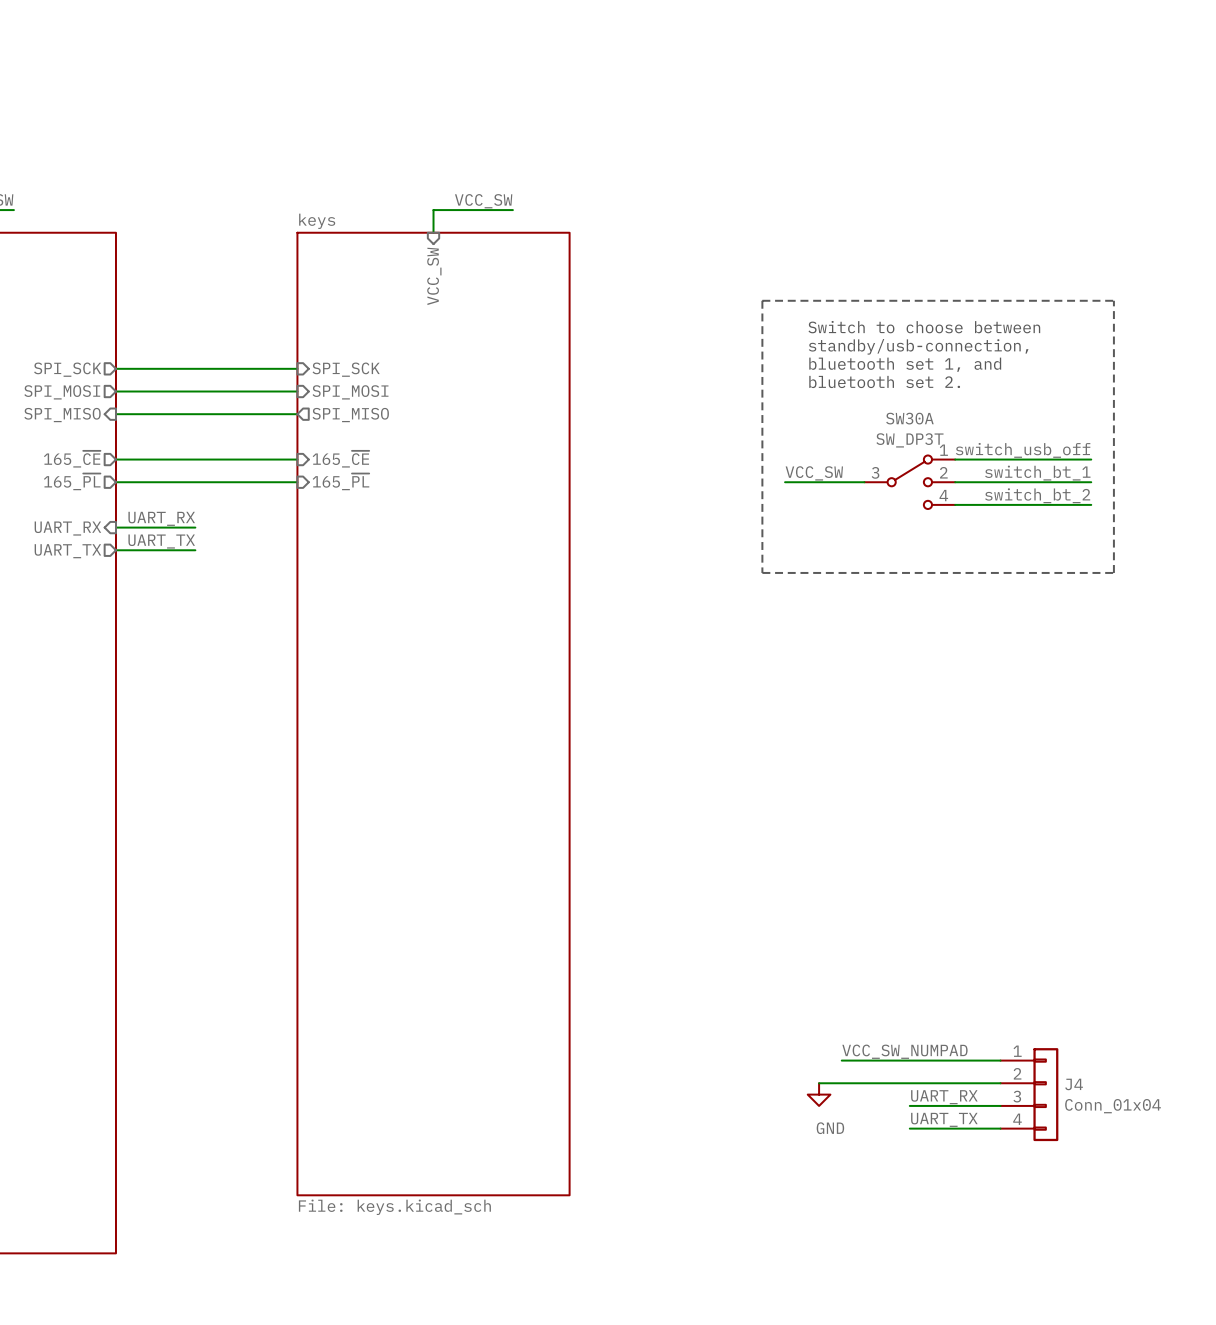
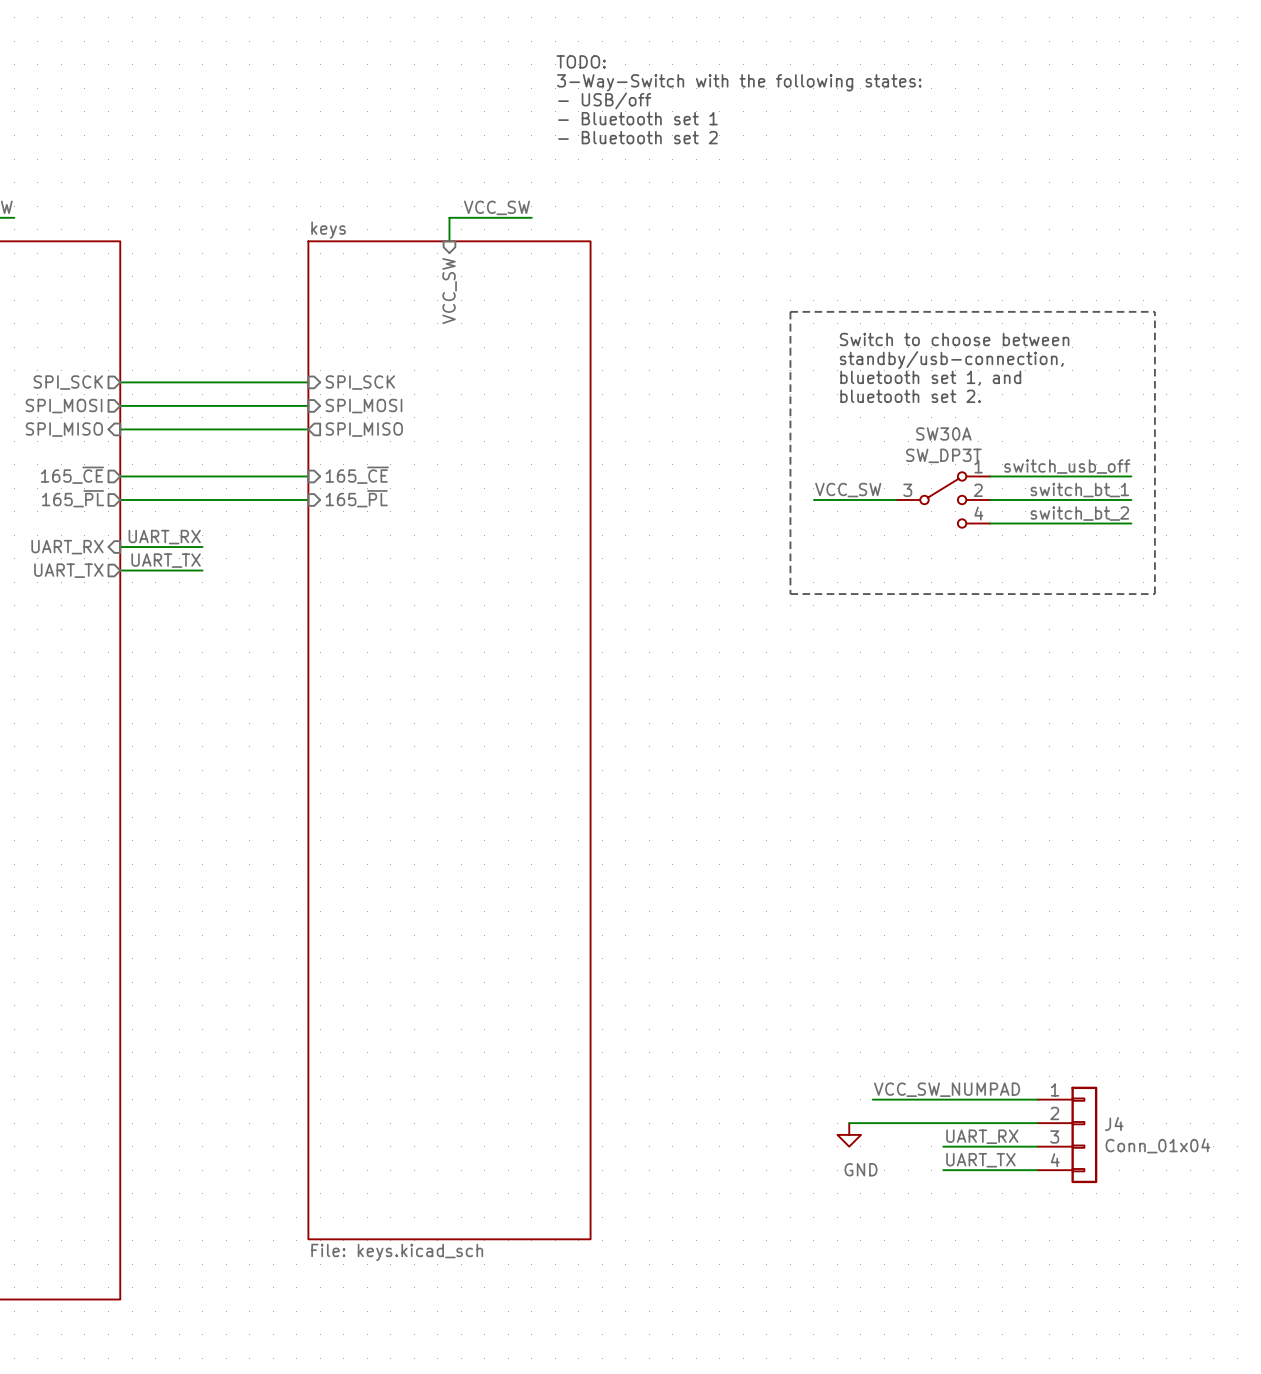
text: none -> TODO: (581, 61)
text: none -> 3-Way-Switch with the following states: (739, 82)
text: none -> - USB/off (604, 100)
text: none -> - Bluetooth set 1 (637, 118)
text: none -> - Bluetooth set 2 (637, 137)

